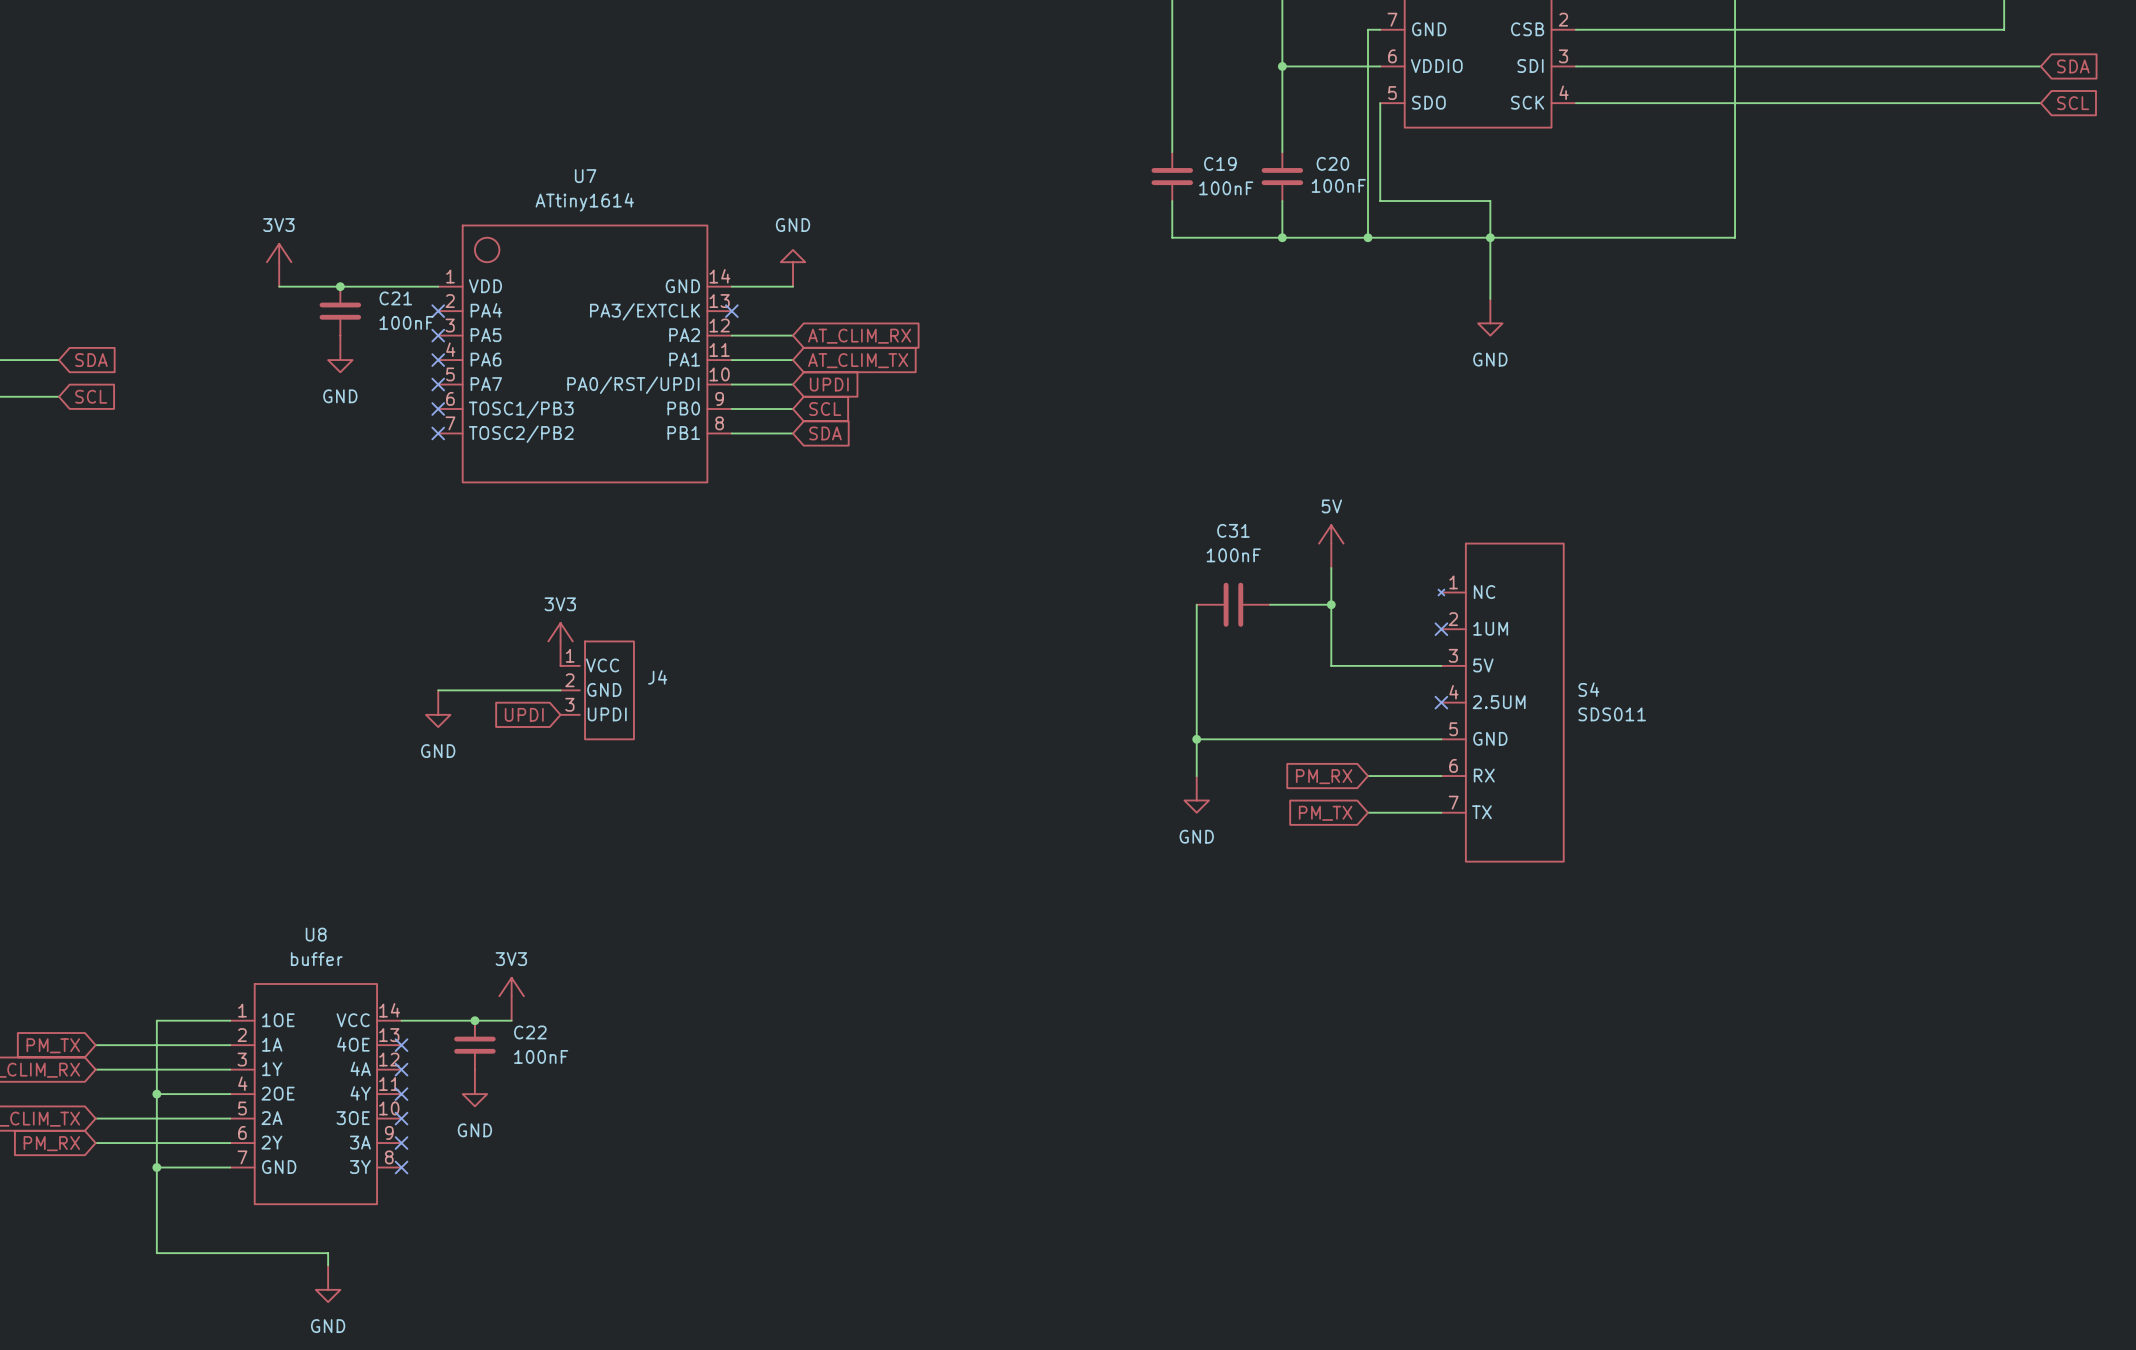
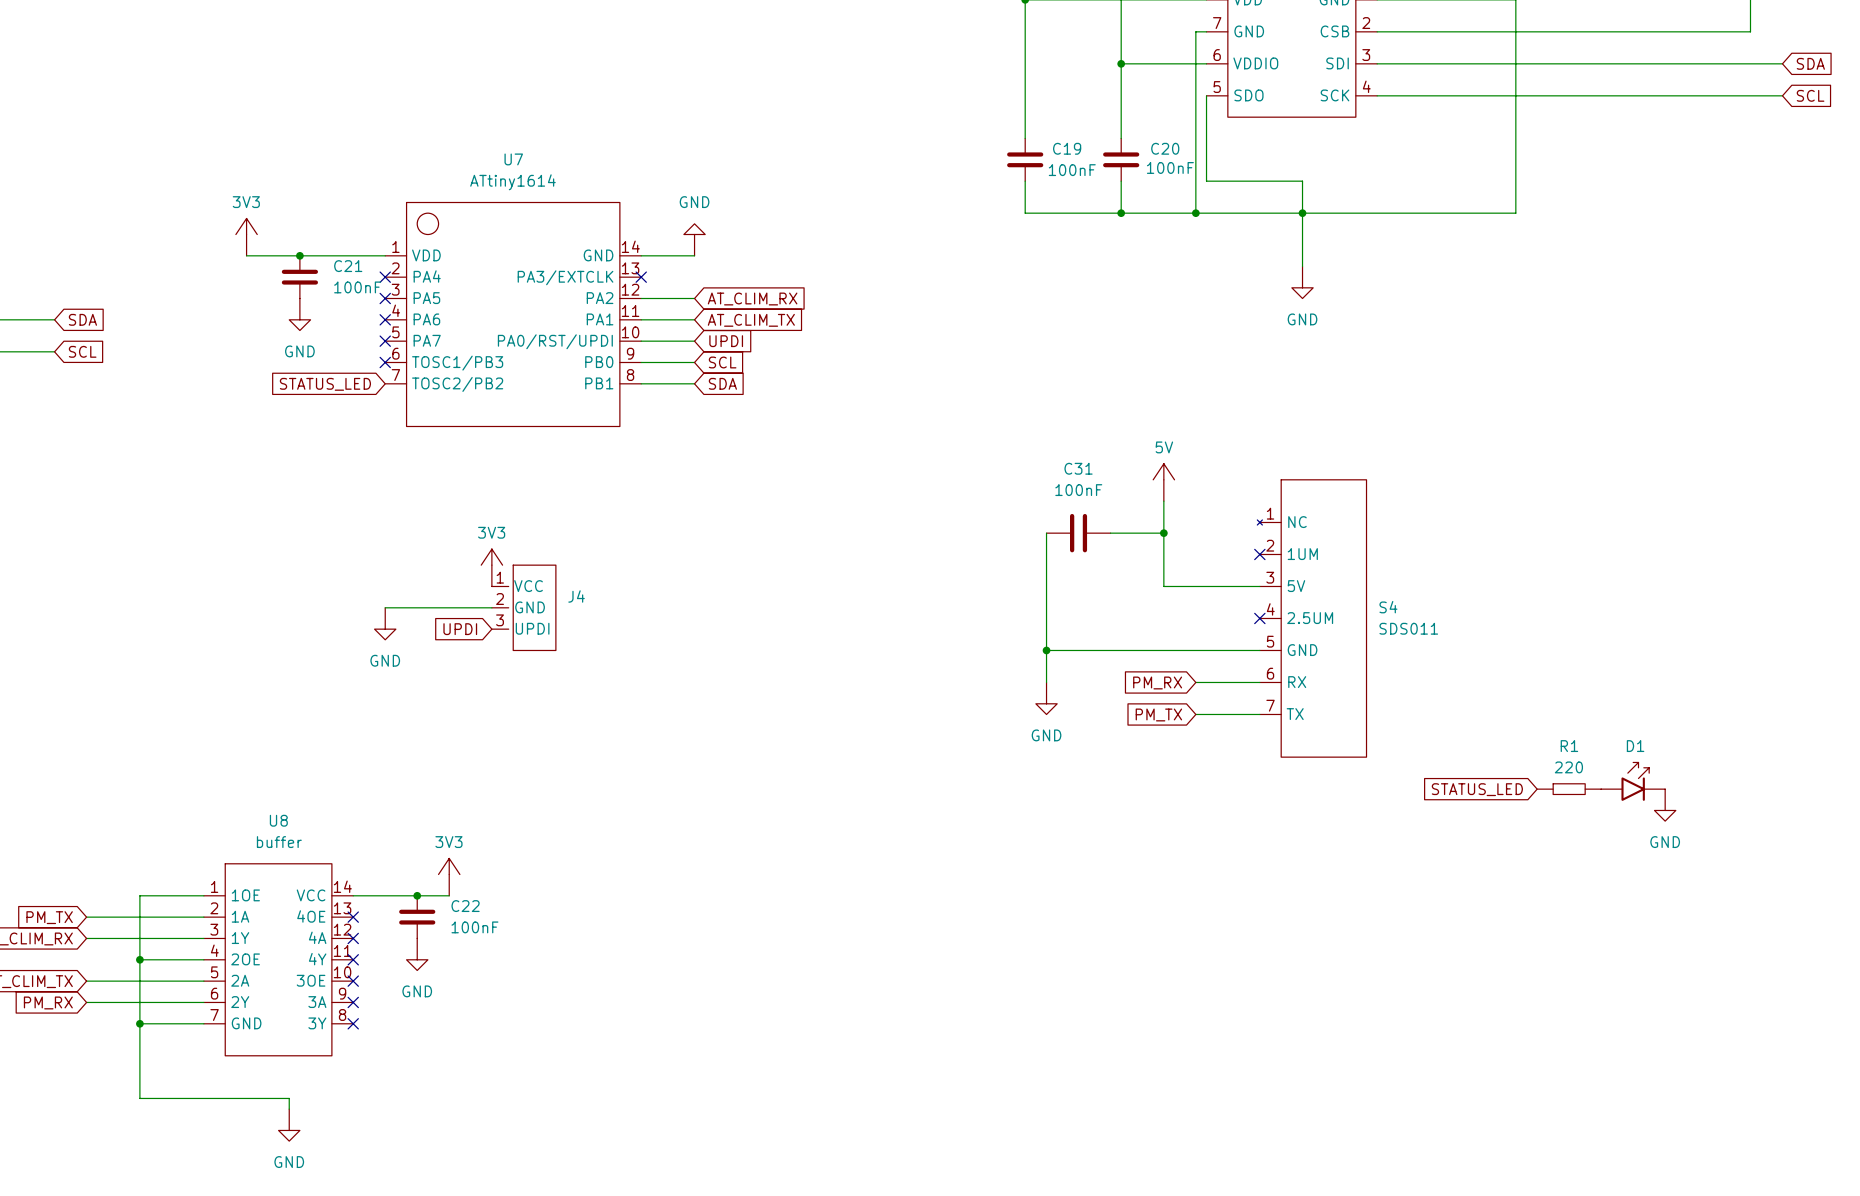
no-connect mark: (438, 433) -> none
global label: none -> STATUS_LED (325, 384)
D1: none -> (1633, 781)
global label: none -> STATUS_LED (1477, 789)
R1: none -> 220 (1569, 789)
power symbol: none -> GND (1665, 805)

